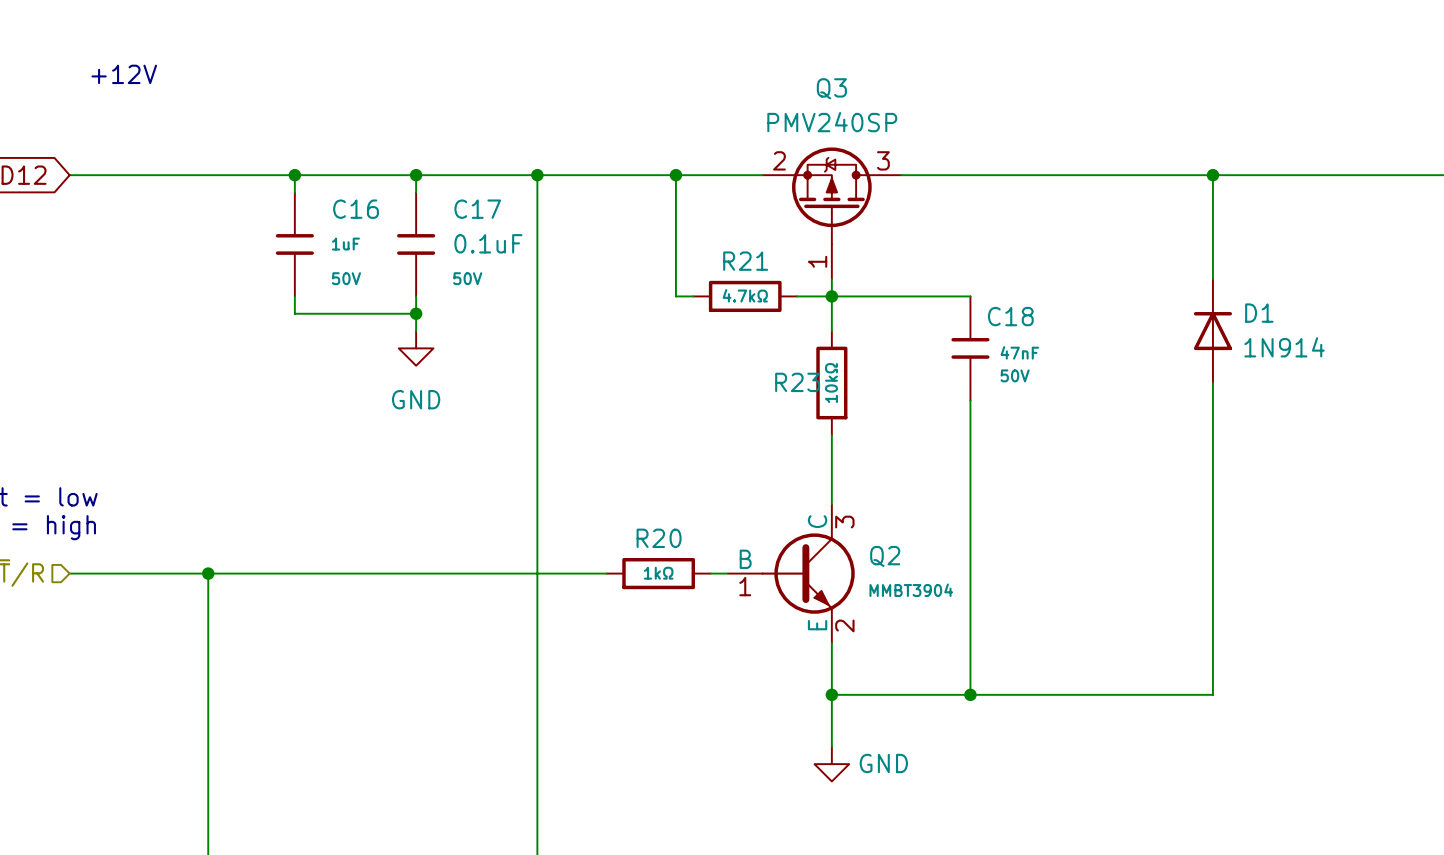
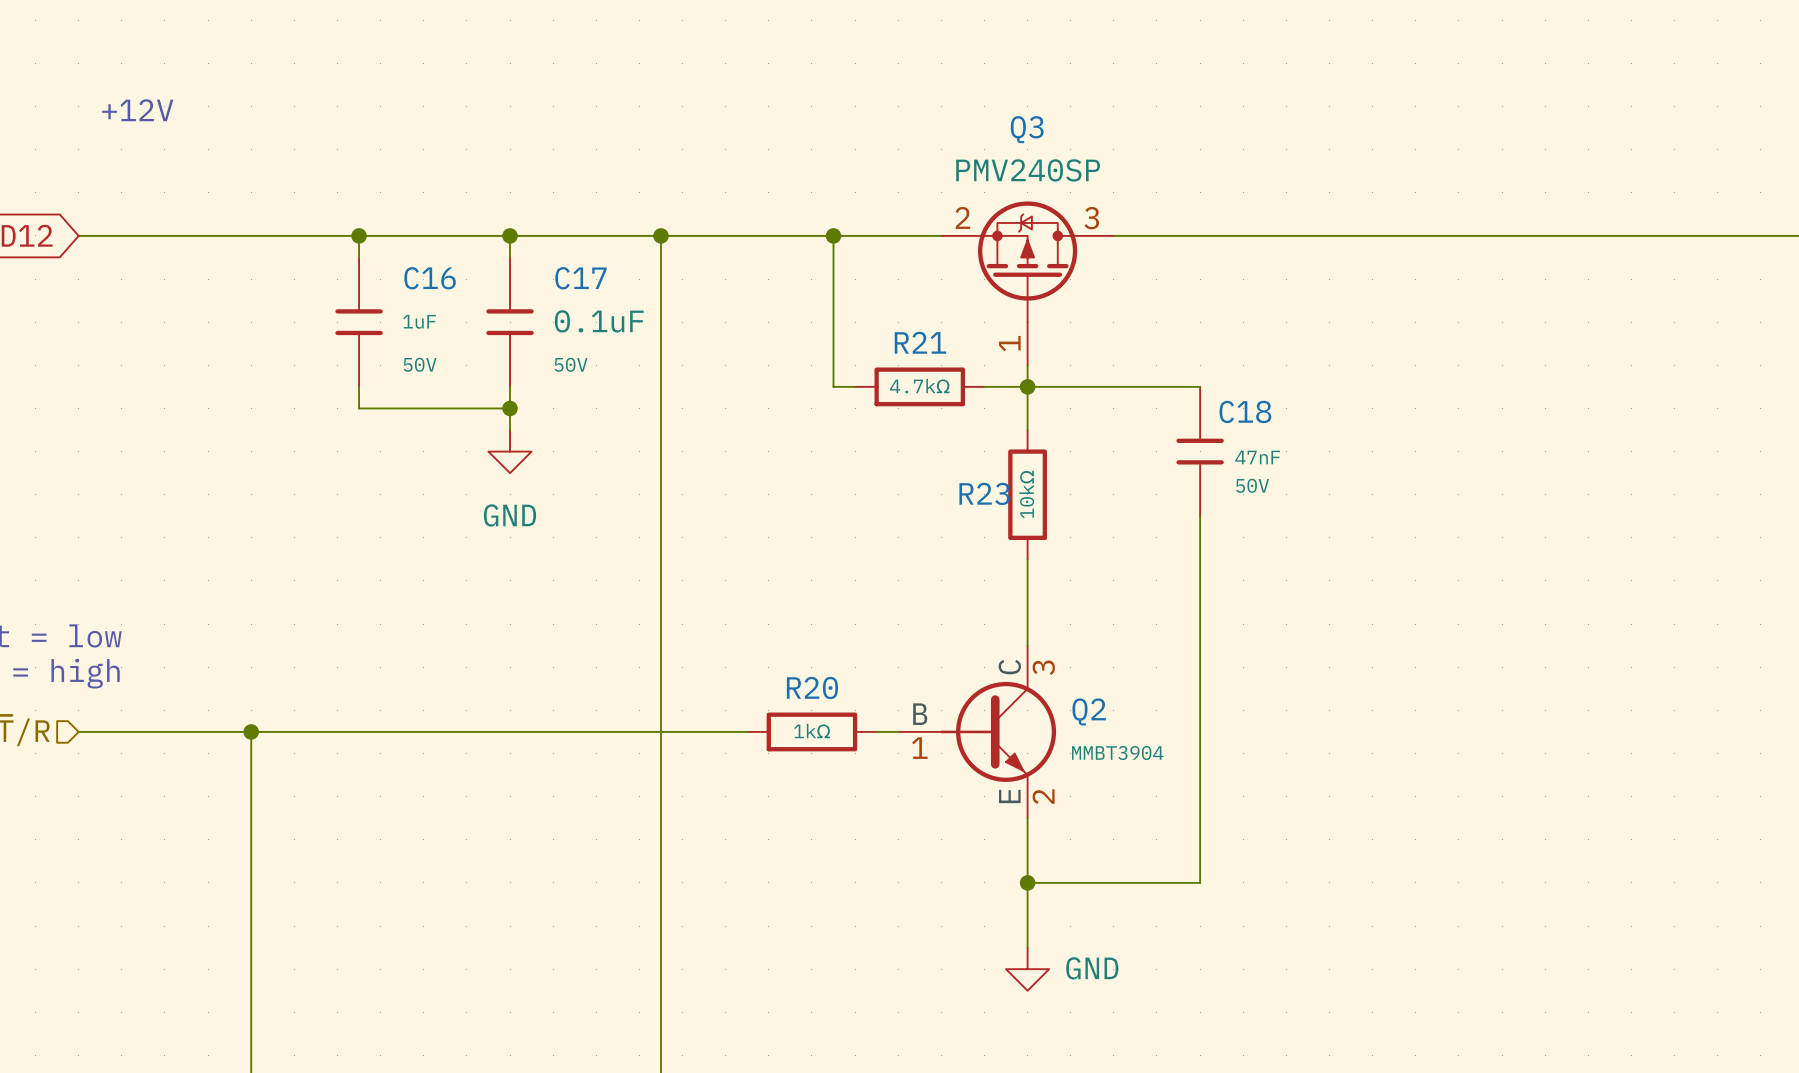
wire: (1212, 175) (1212, 279) -> none
junction: (1212, 175) -> none
D1: 1N914 (1212, 331) -> none
wire: (1212, 383) (1212, 694) (970, 694) -> none
junction: (970, 694) -> none

